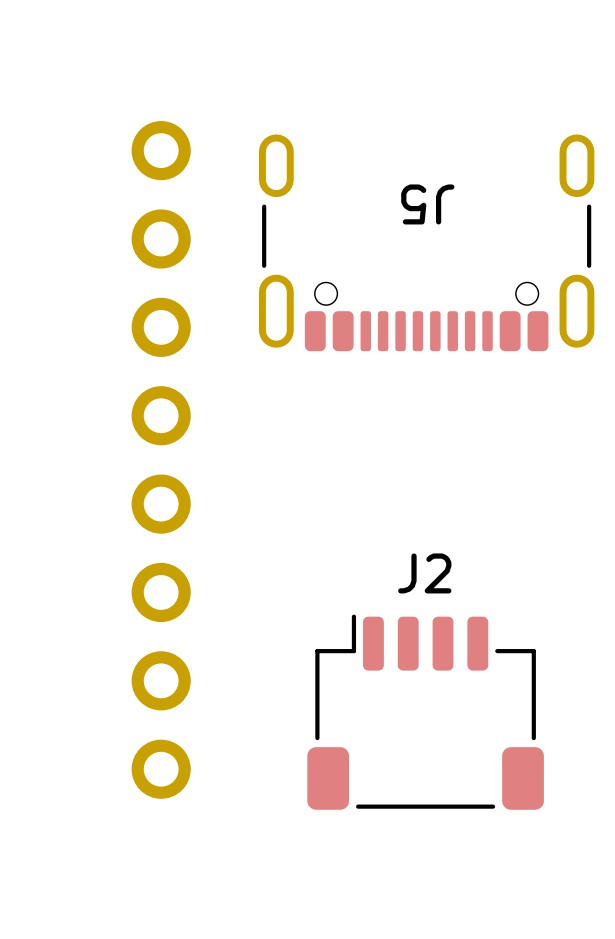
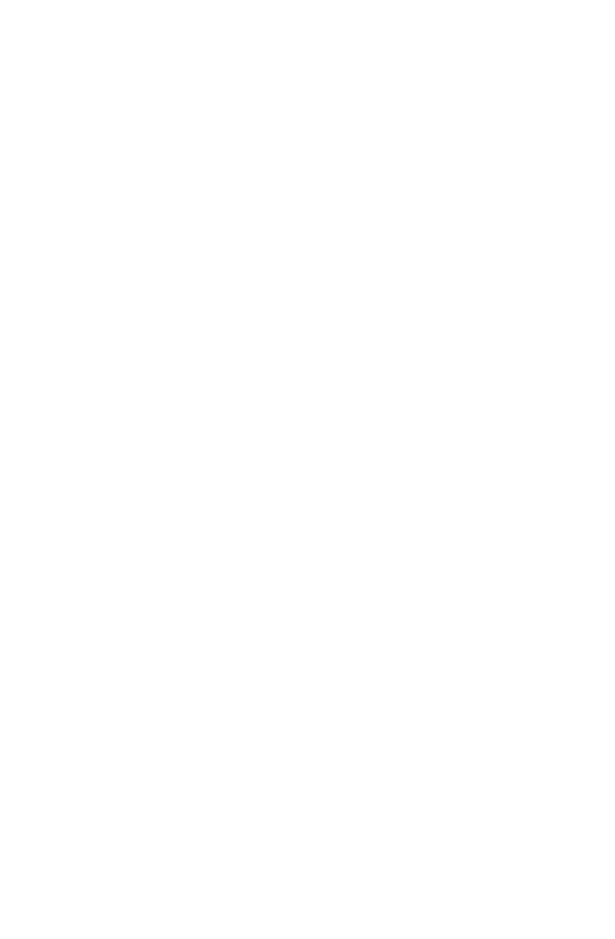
J5: (426, 242) -> none
part: (161, 459) -> none
J2: (425, 712) -> none

